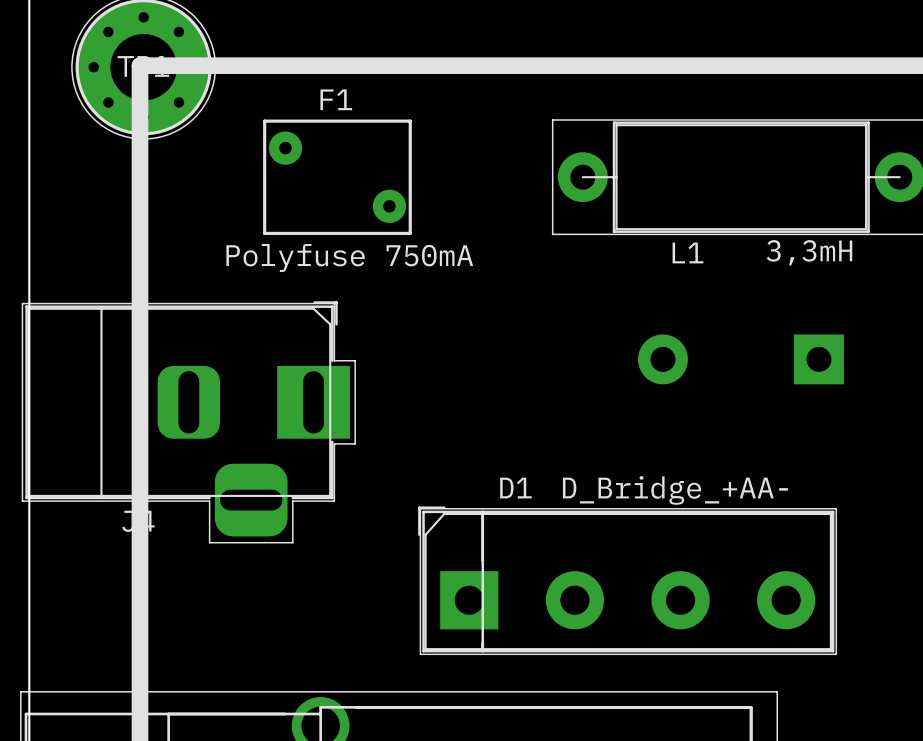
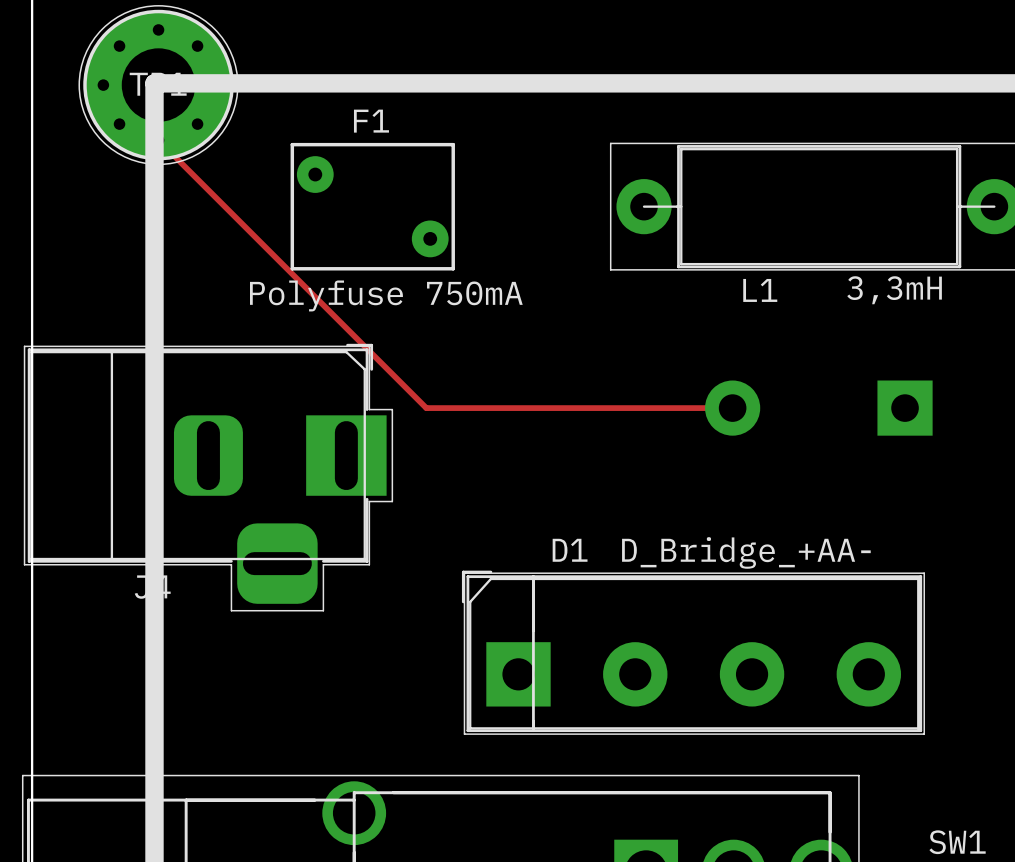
track: none -> (158, 140) (426, 408) (732, 408)

